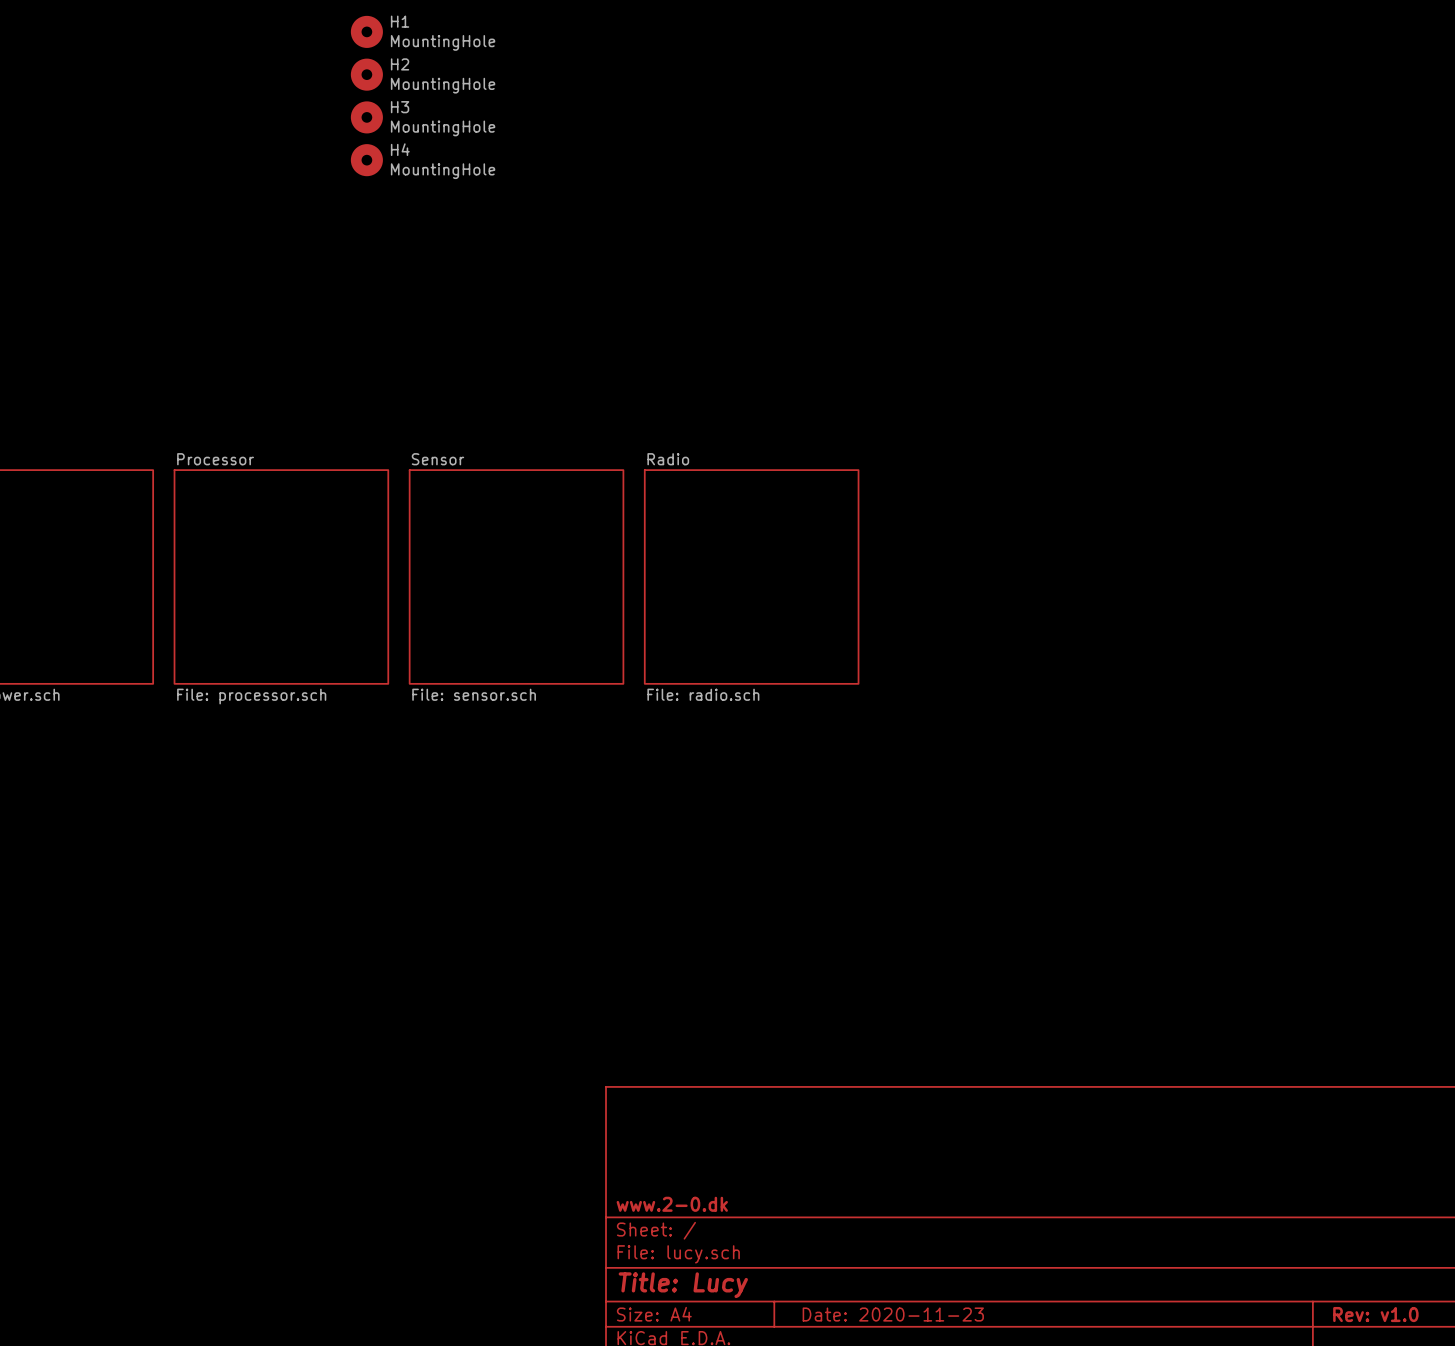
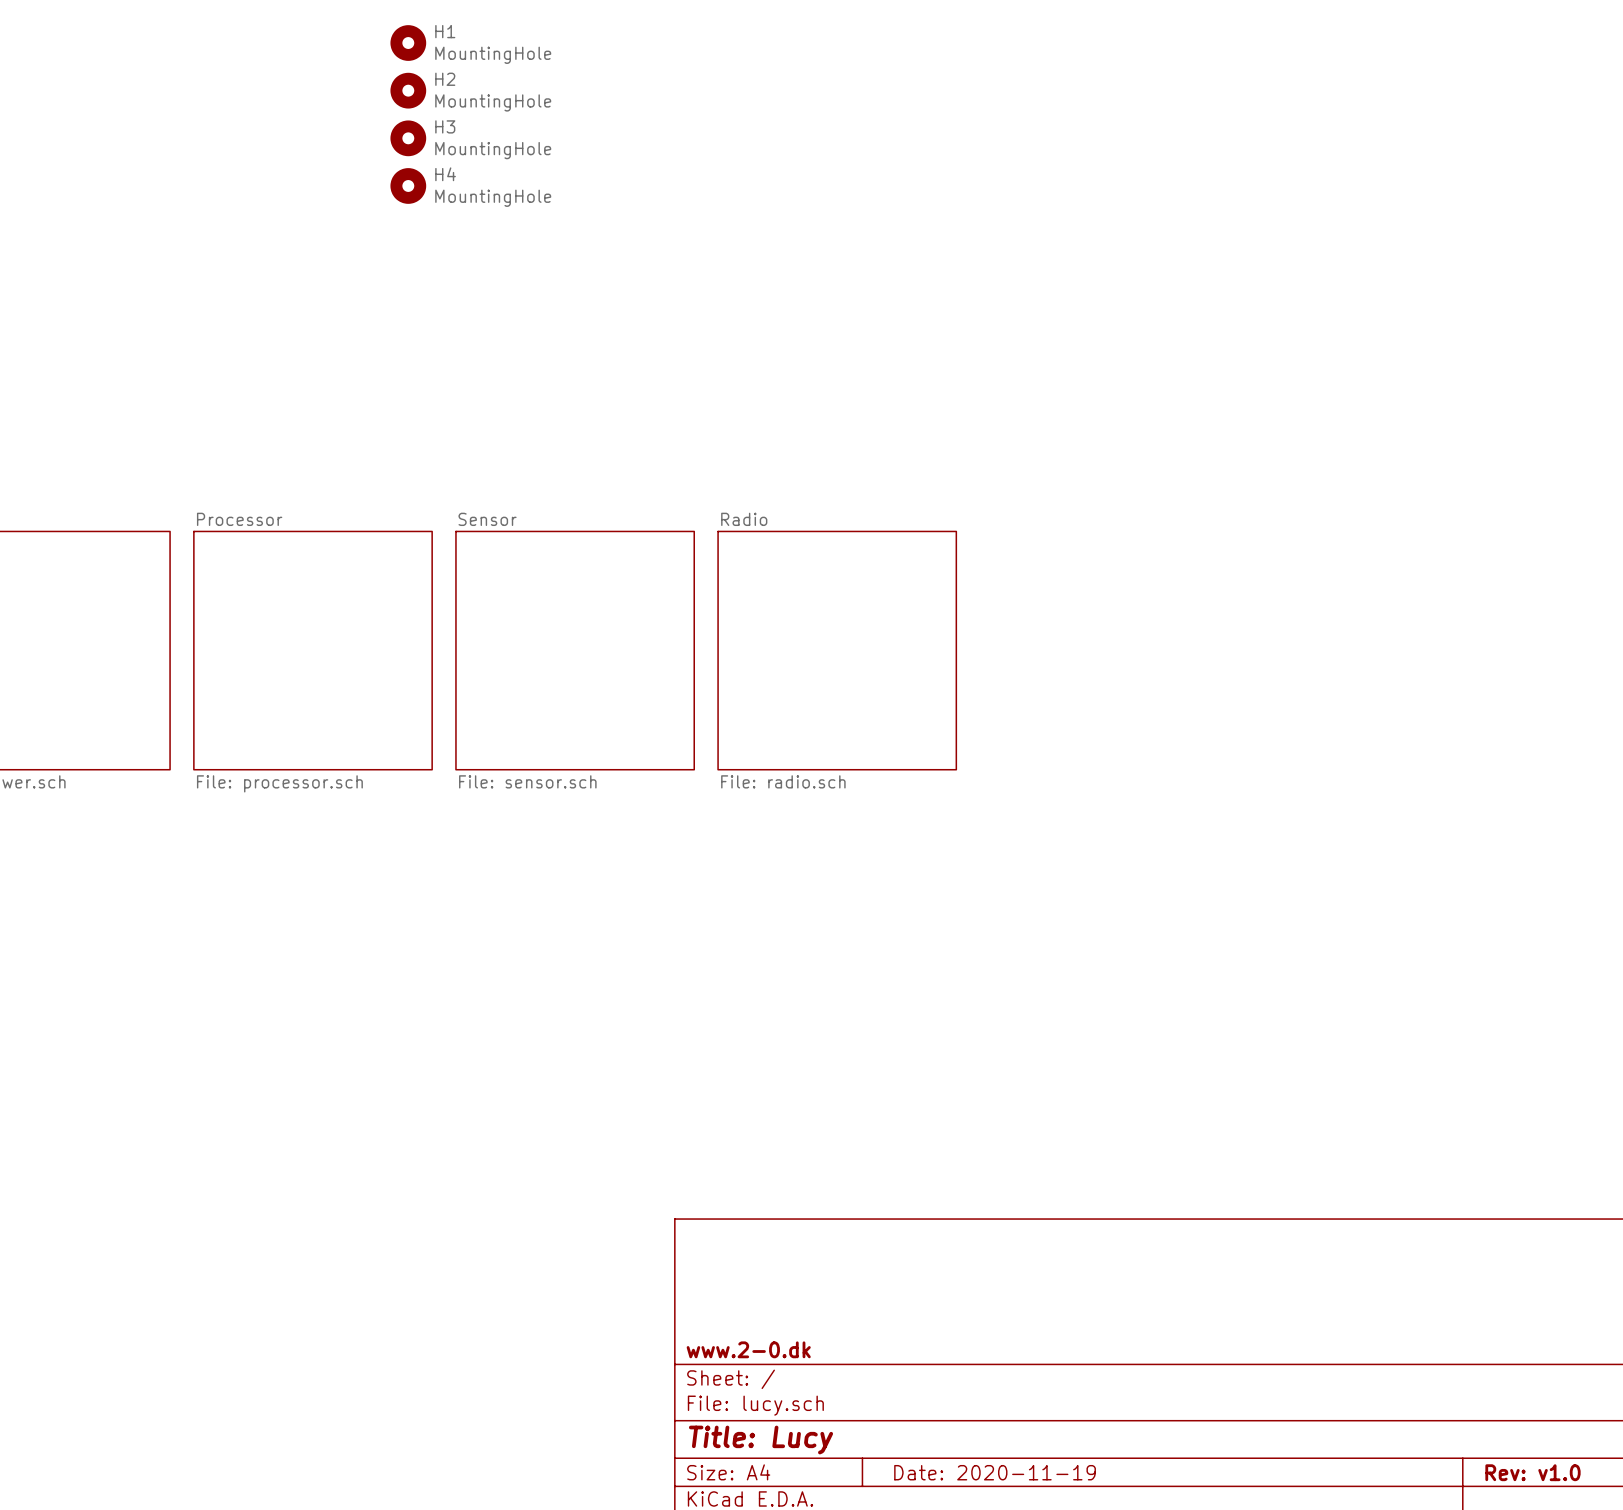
title block: Date: 2020-11-23 (893, 1314) -> Date: 2020-11-19 (995, 1472)

